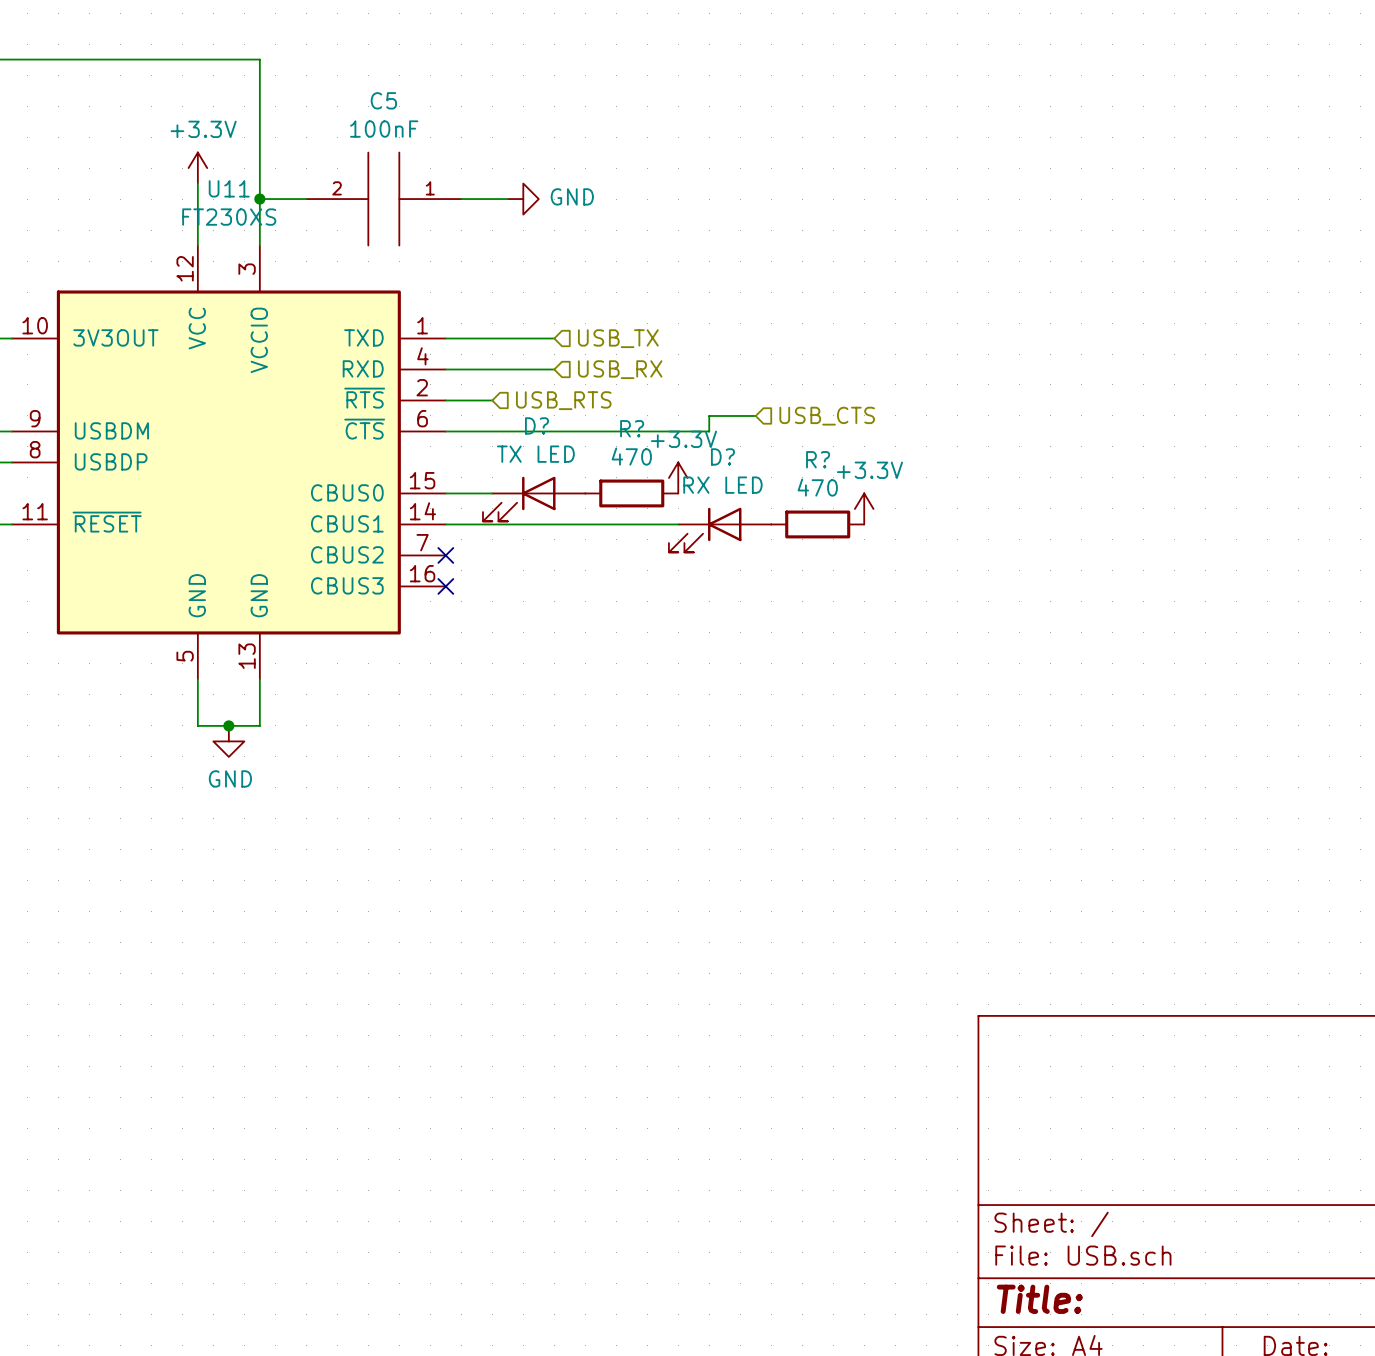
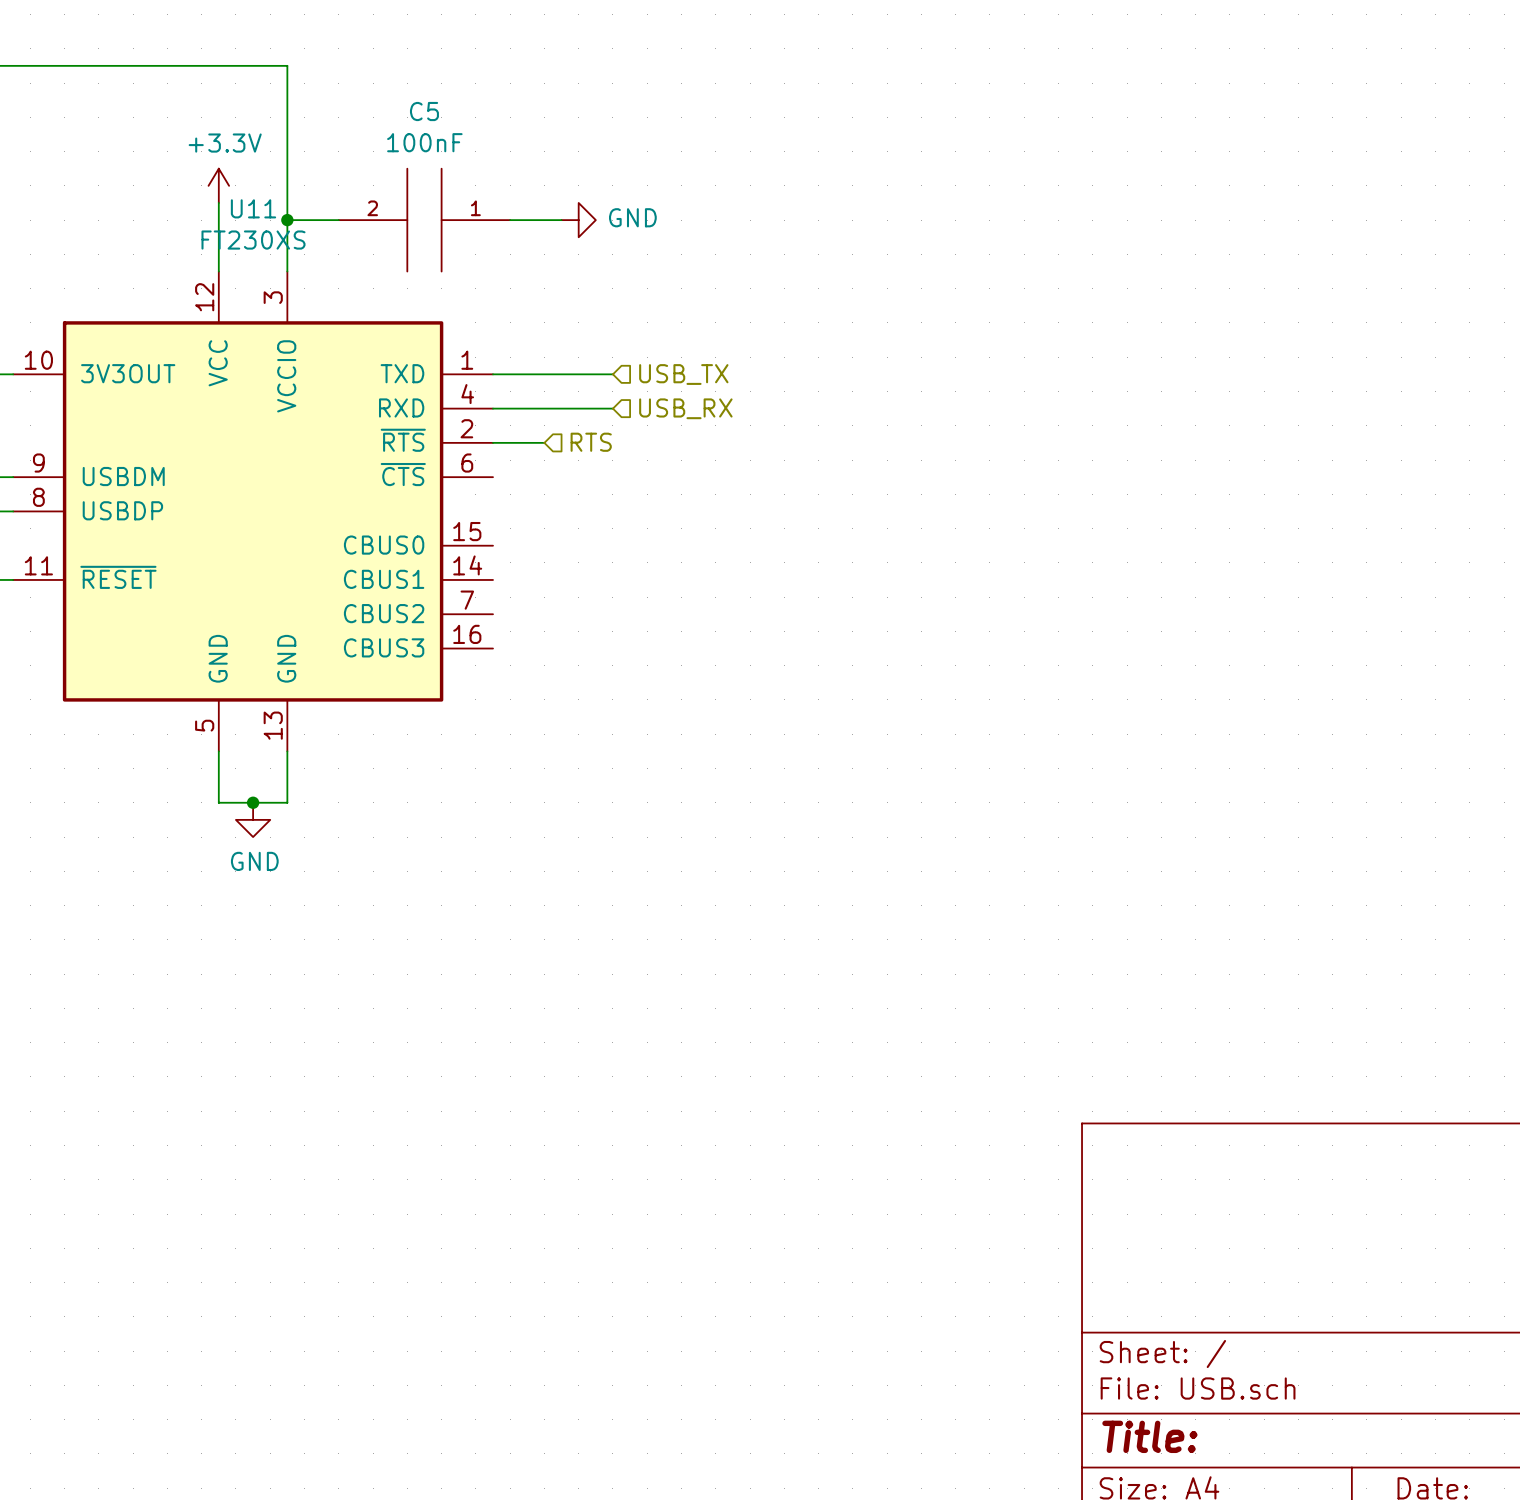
hierarchical label: USB_RTS (563, 400) -> RTS (591, 442)
wire: (755, 415) (709, 415) (709, 431) (445, 431) -> none
hierarchical label: USB_CTS (827, 416) -> none
power symbol: +3.3V (678, 477) -> none
wire: (445, 493) (492, 493) -> none
R?: 470 (631, 493) -> none
D?: TX LED (534, 499) -> none
power symbol: +3.3V (864, 508) -> none
wire: (445, 524) (678, 524) -> none
R?: 470 (817, 524) -> none
D?: RX LED (720, 530) -> none
no-connect mark: (445, 555) -> none
no-connect mark: (445, 586) -> none

